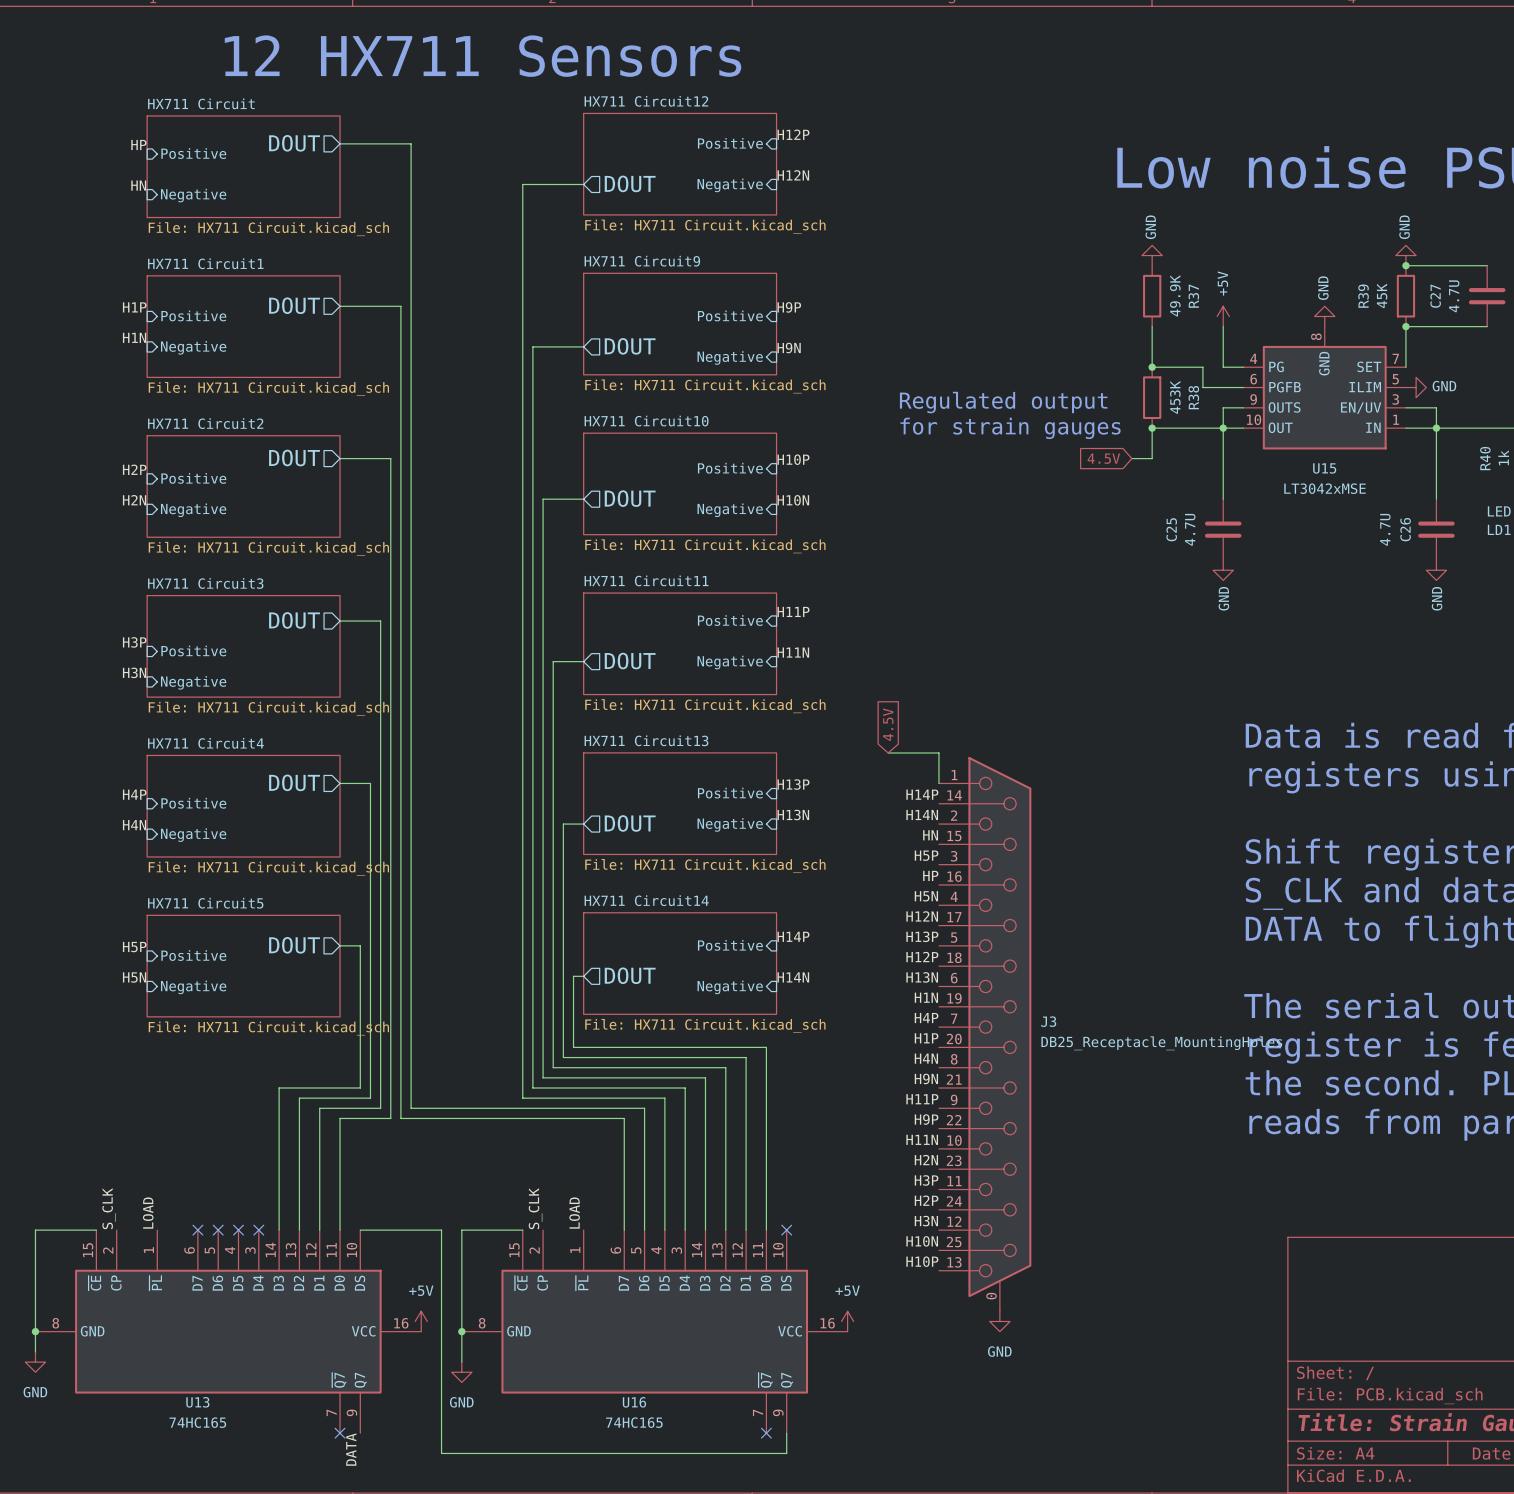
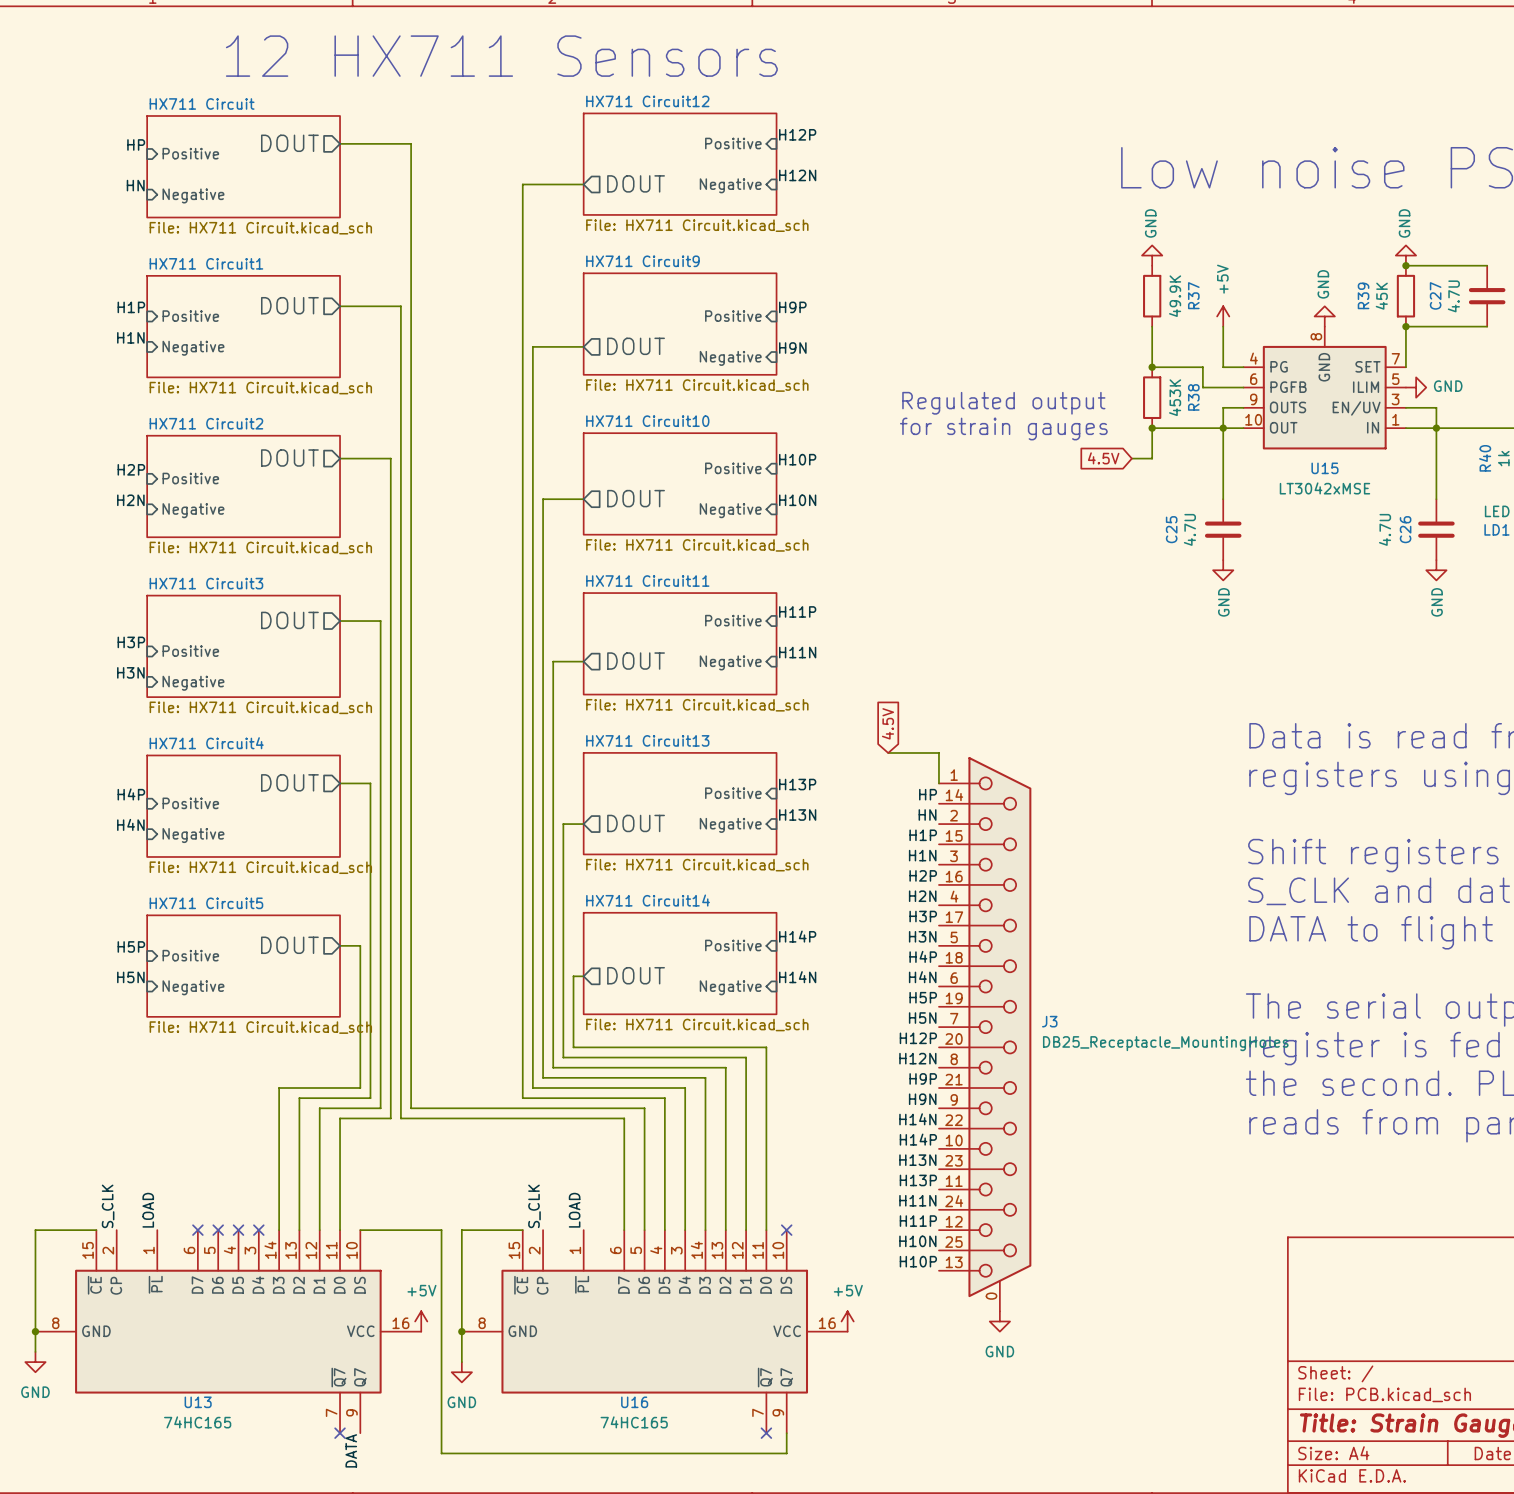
label: H14P (922, 794) -> HP (928, 794)
label: H14N (922, 814) -> HN (927, 814)
label: HN (930, 835) -> H1P (923, 835)
label: H5P (926, 855) -> H1N (922, 855)
label: HP (930, 875) -> H2P (923, 875)
label: H5N (926, 896) -> H2N (922, 896)
label: H12N (922, 916) -> H3P (923, 916)
label: H13P (922, 936) -> H3N (922, 936)
label: H12P (922, 957) -> H4P (923, 956)
label: H13N (922, 977) -> H4N (922, 977)
label: H1N (926, 997) -> H5P (923, 997)
label: H4P (926, 1018) -> H5N (922, 1018)
label: H1P (926, 1038) -> H12P (918, 1038)
label: H4N (926, 1058) -> H12N (917, 1058)
label: H9N (926, 1078) -> H9P (923, 1078)
label: H11P (922, 1099) -> H9N (922, 1099)
label: H9P (926, 1119) -> H14N (917, 1119)
label: H11N (922, 1139) -> H14P (918, 1139)
label: H2N (926, 1160) -> H13N (917, 1160)
label: H3P (926, 1180) -> H13P (918, 1180)
label: H2P (926, 1200) -> H11N (917, 1200)
label: H3N (926, 1221) -> H11P (918, 1221)

